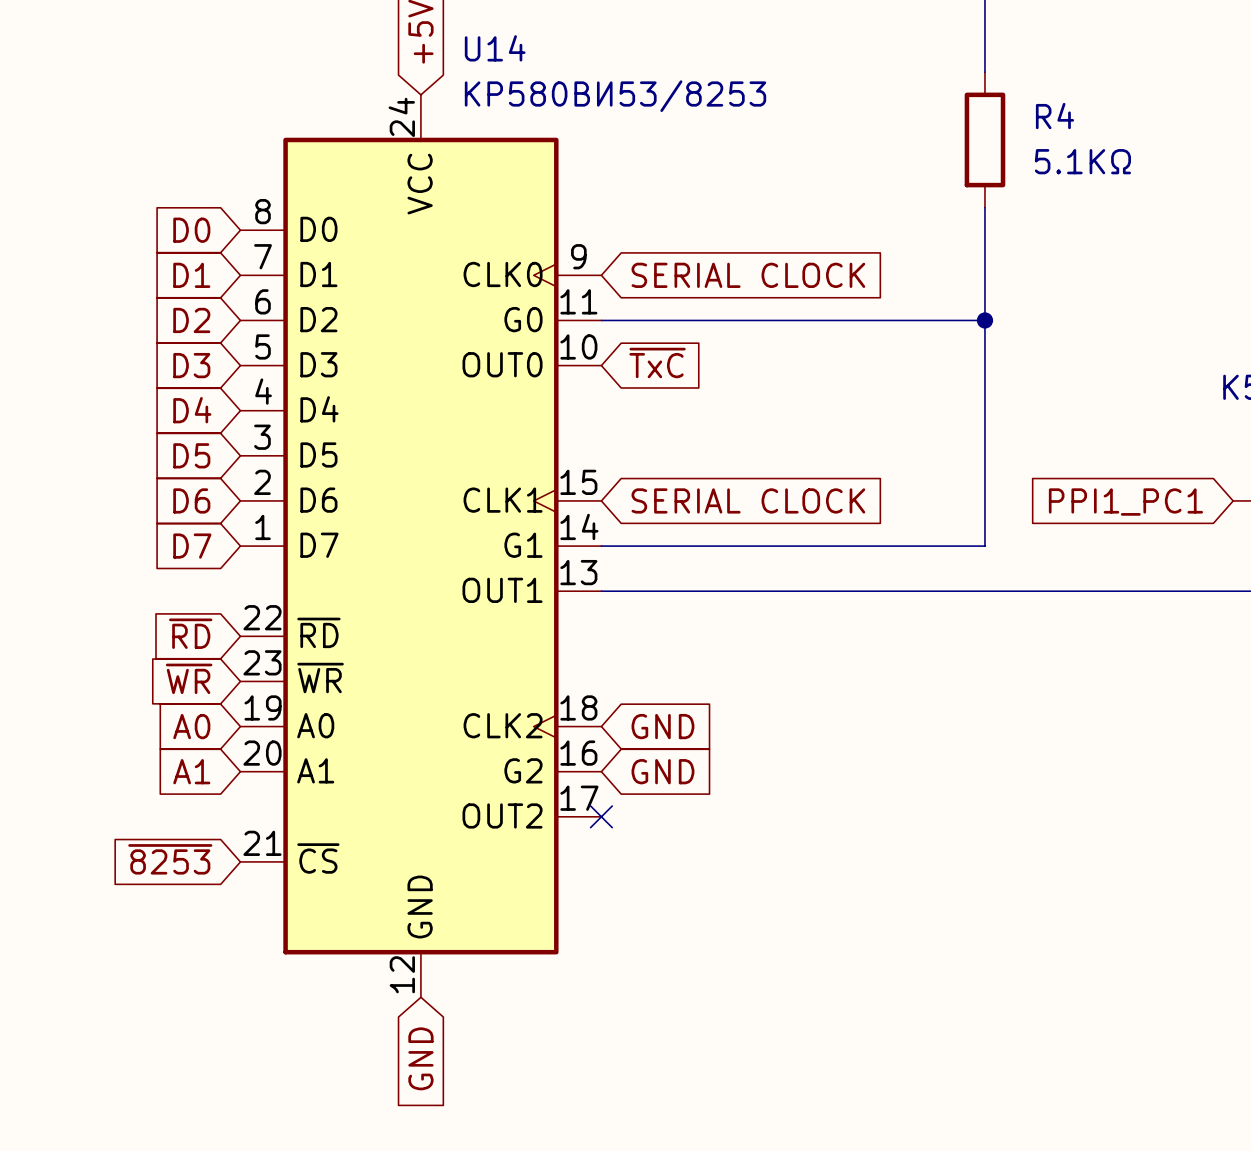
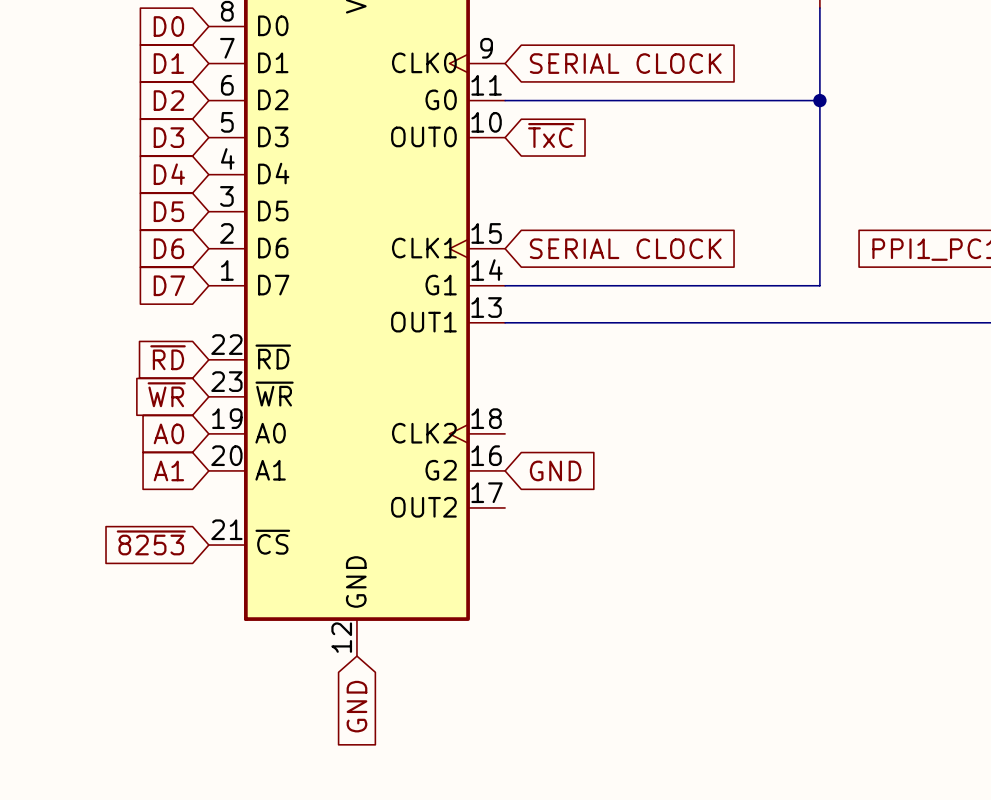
global label: GND (662, 726) -> none
no-connect mark: (601, 816) -> none

